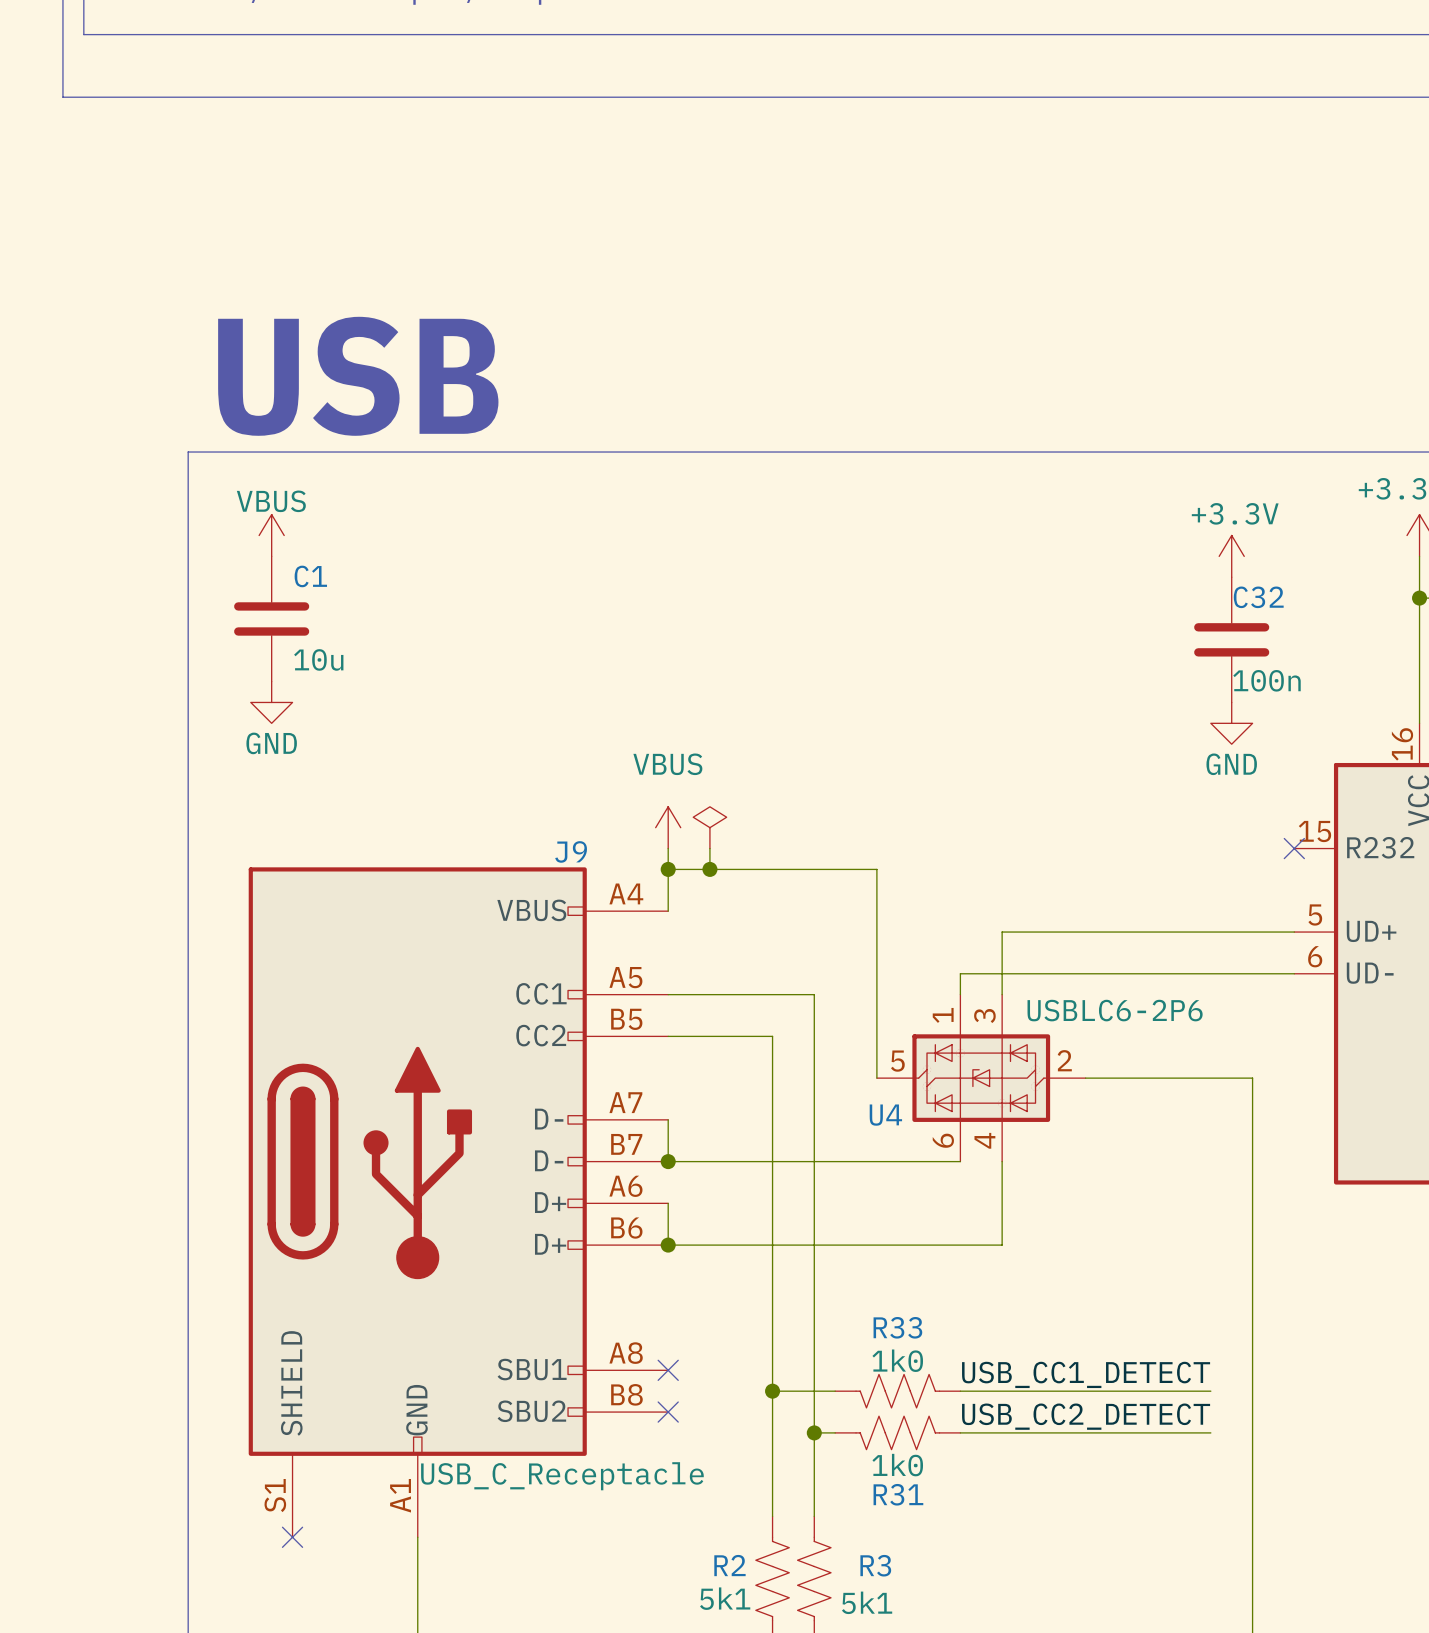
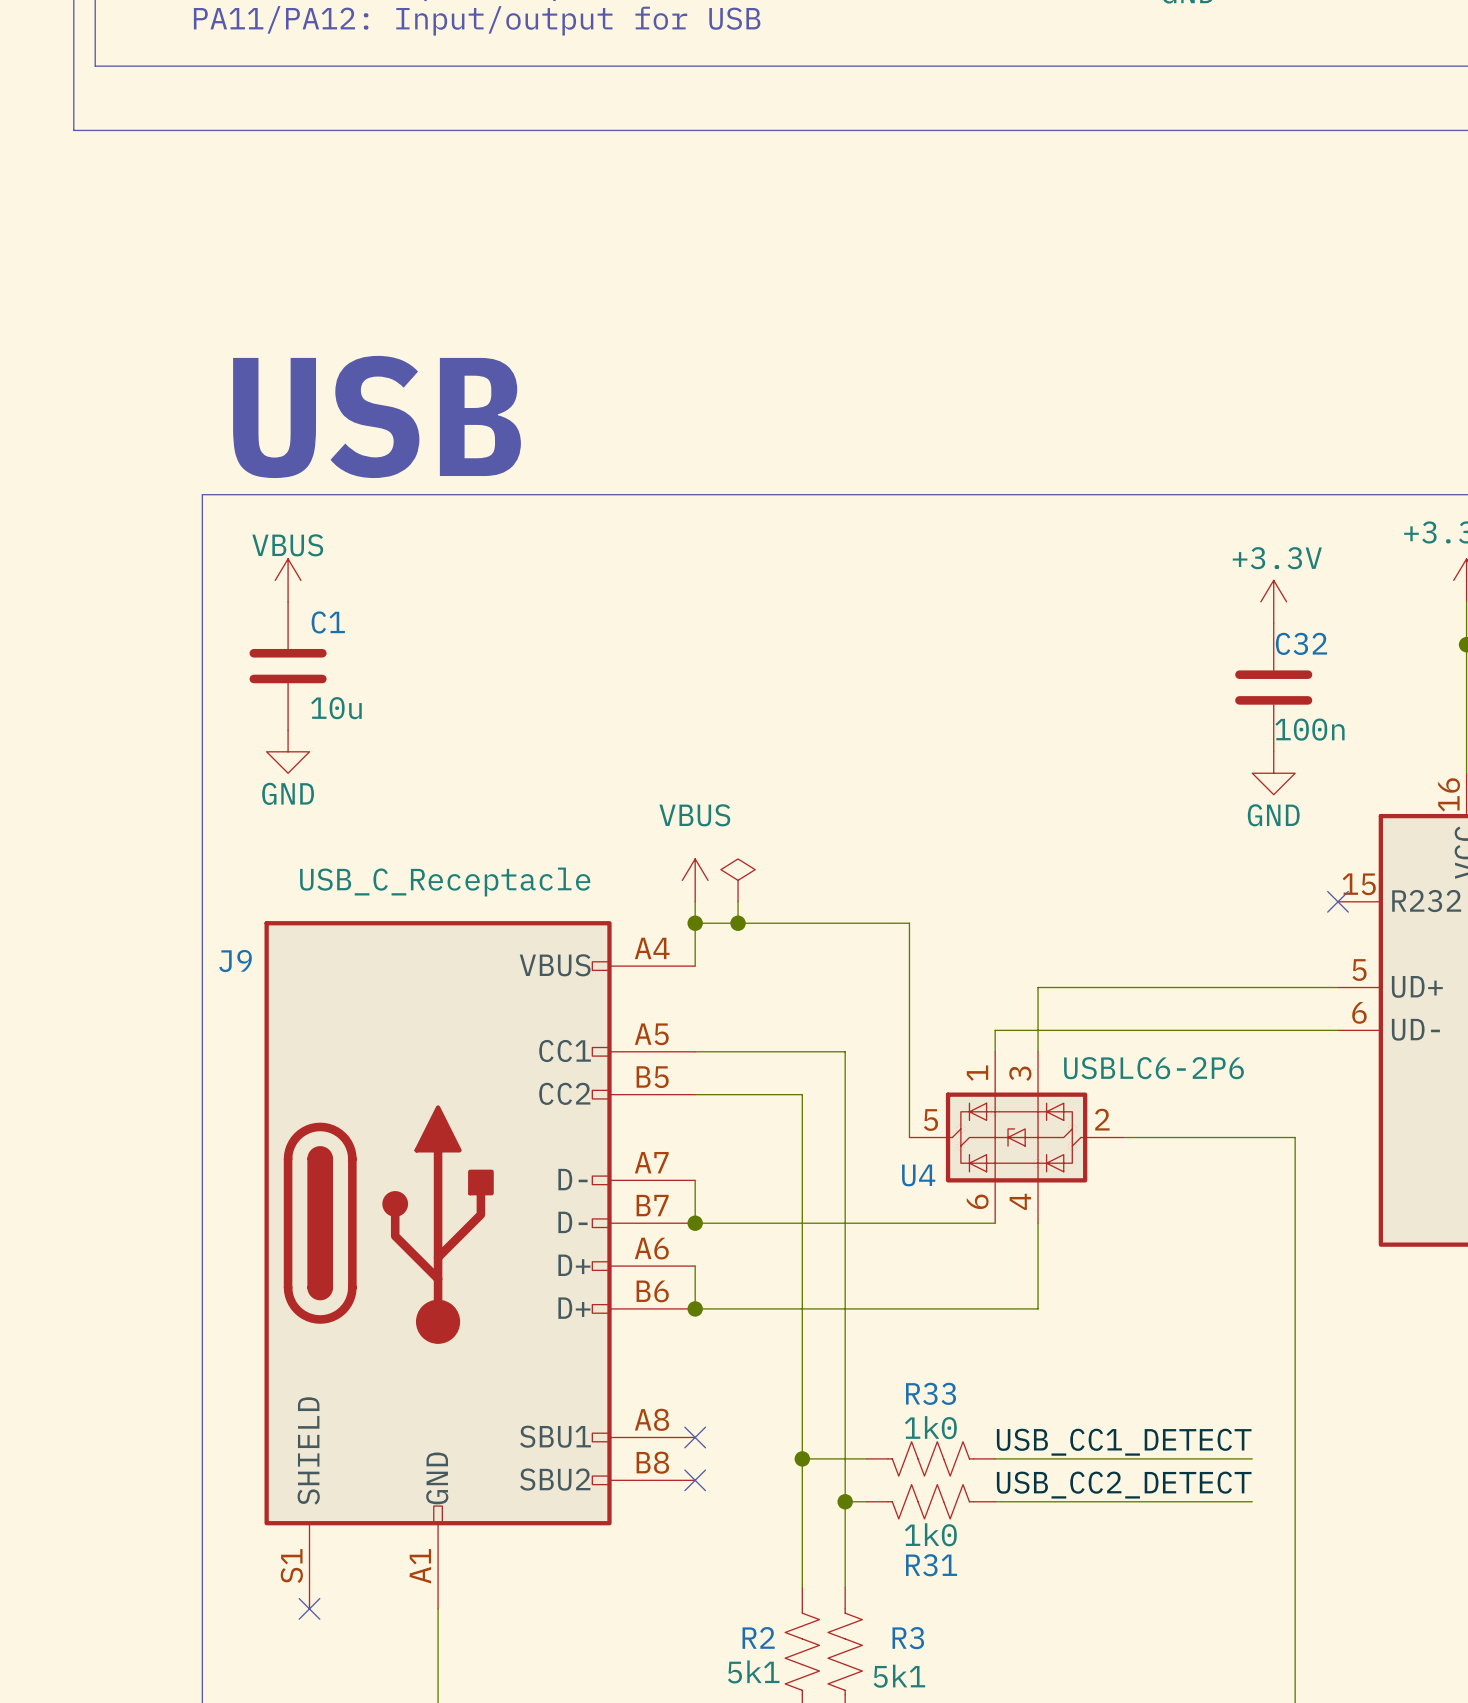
J9 name position: J9 (571, 851) -> J9 (235, 961)
J9 value position: USB_C_Receptacle (562, 1476) -> USB_C_Receptacle (445, 882)

